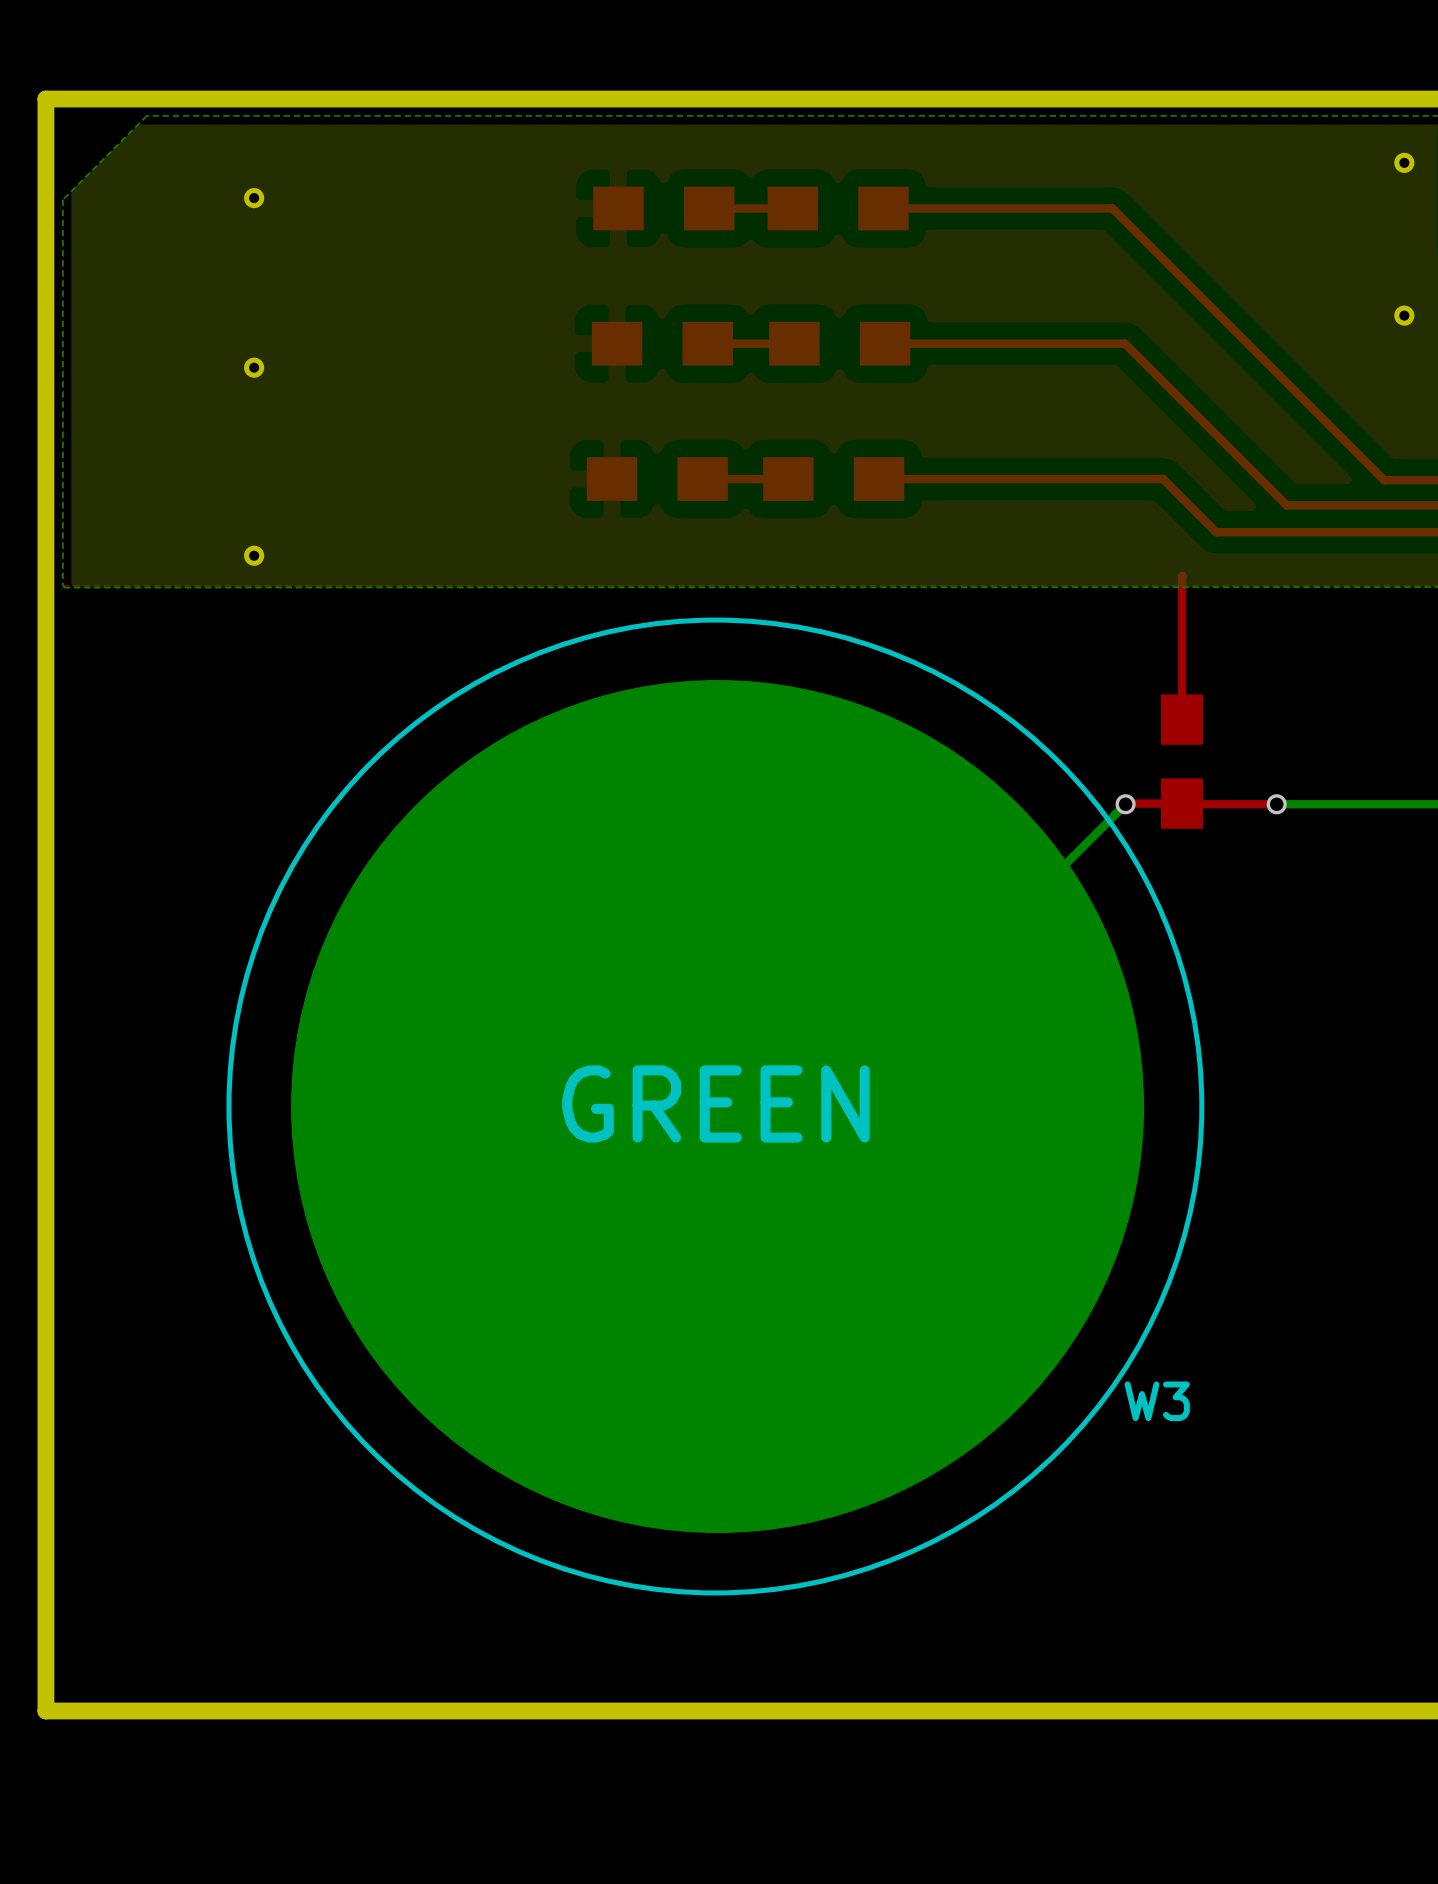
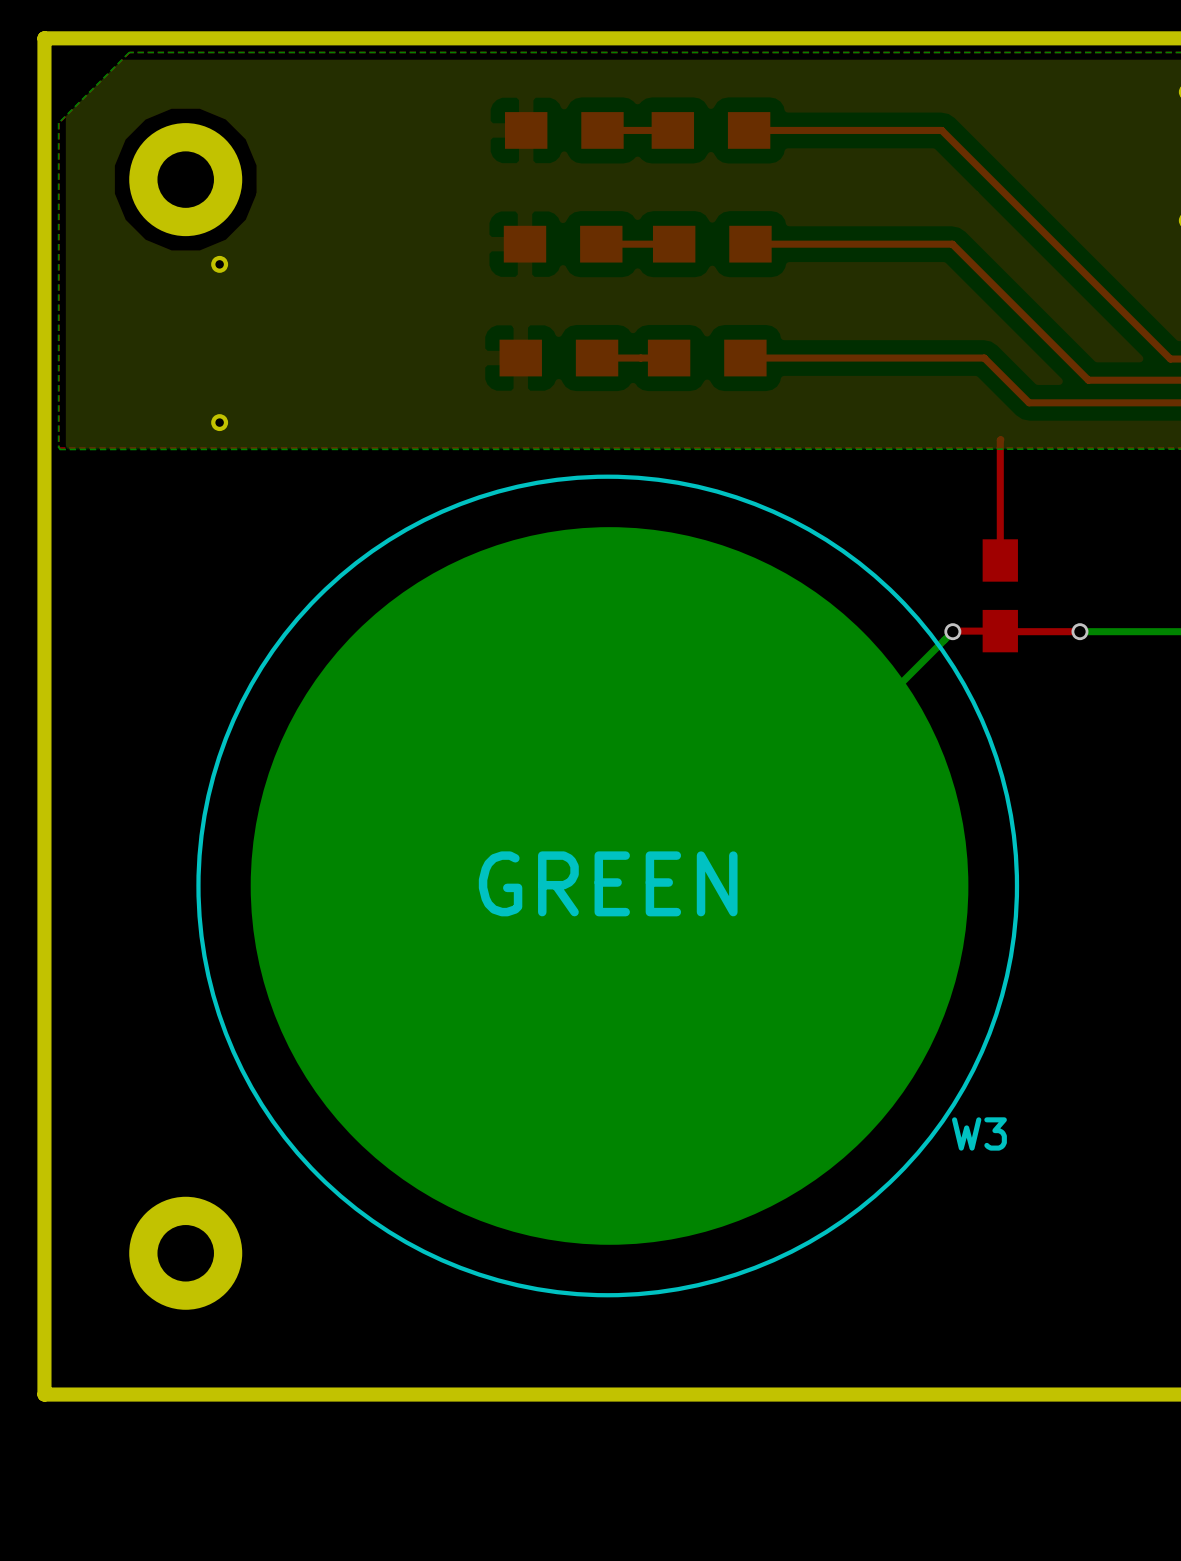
part: (254, 198) -> none
part: none -> (185, 179)
part: none -> (185, 1253)

